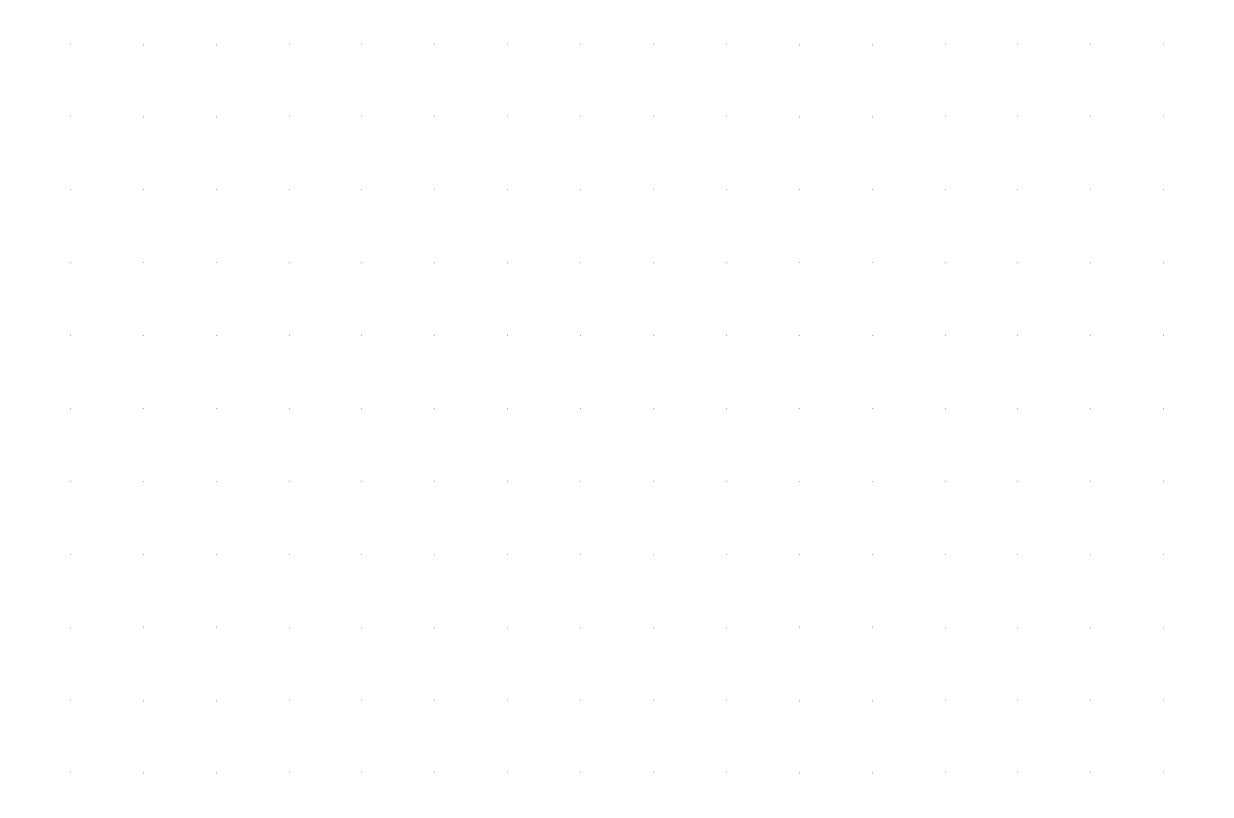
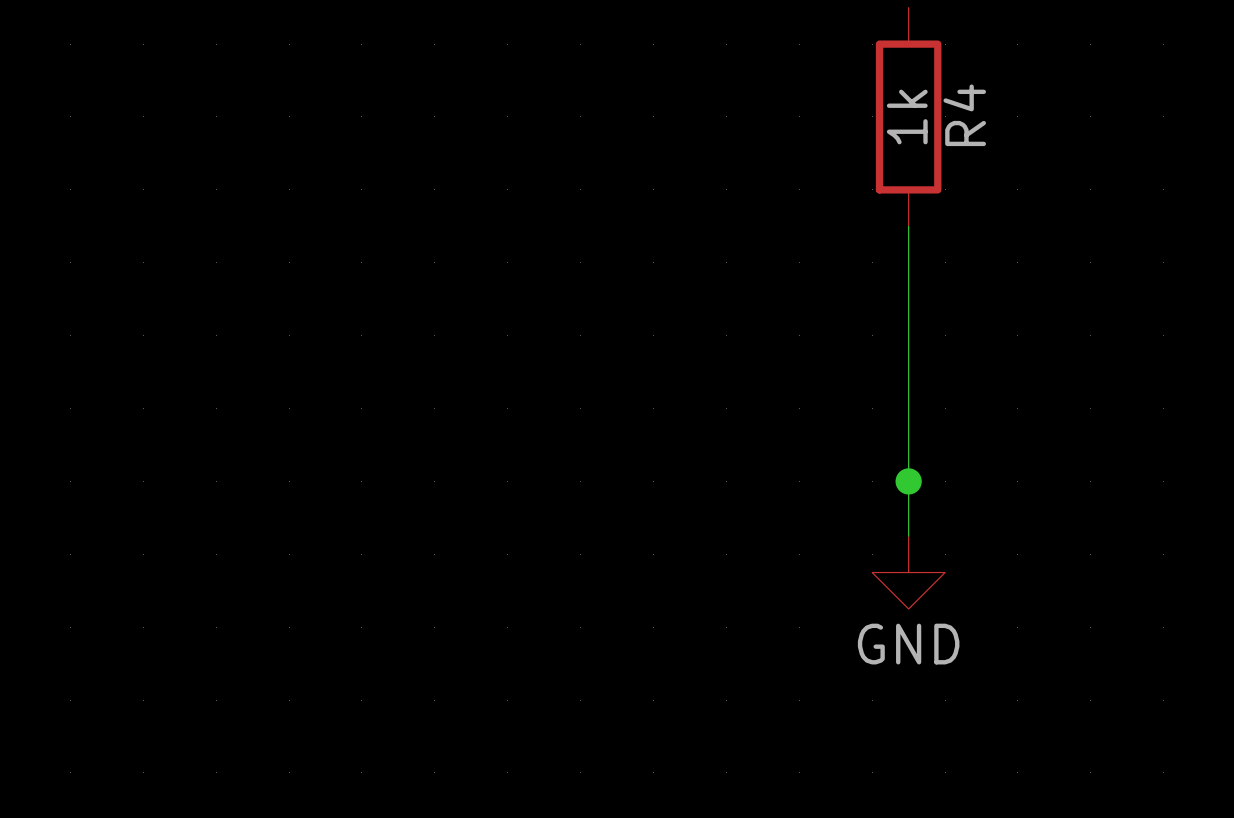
R4: none -> 1k (908, 116)
wire: none -> (908, 226) (908, 536)
junction: none -> (908, 481)
power symbol: none -> GND (908, 572)

